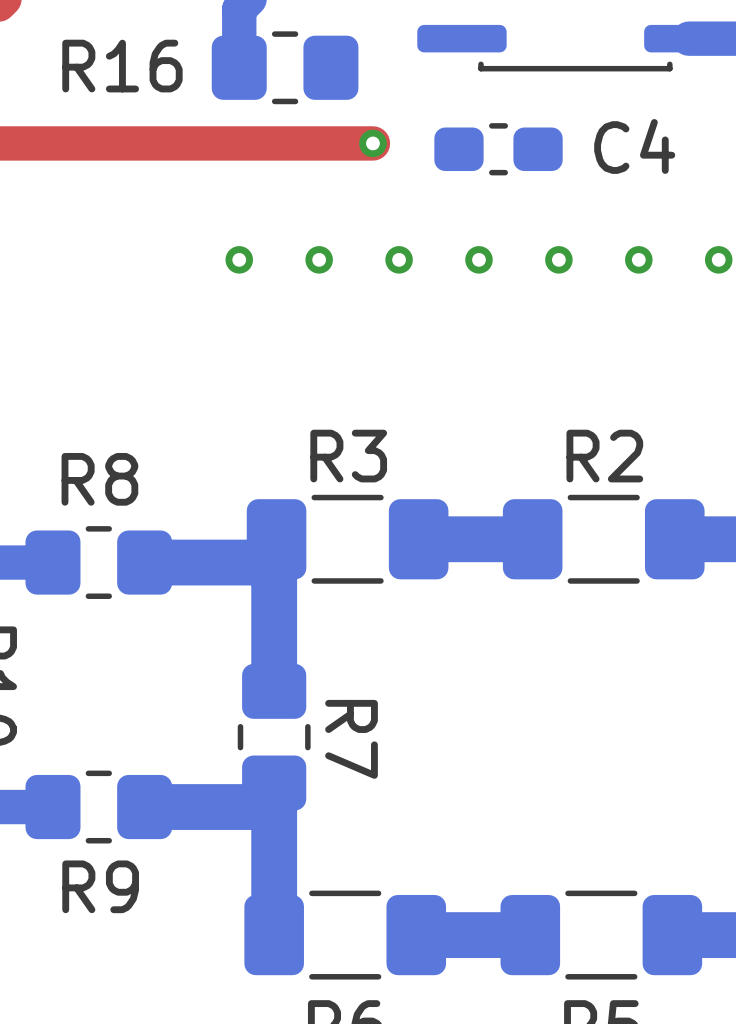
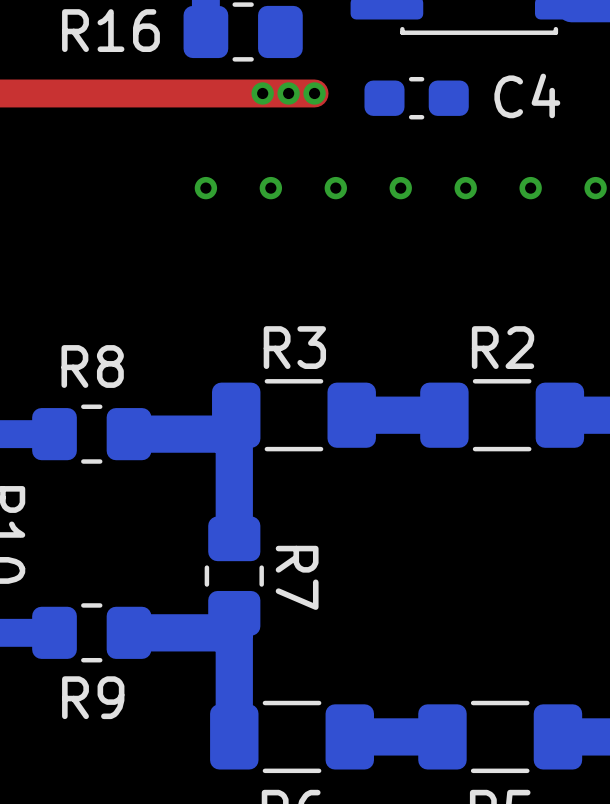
via: none -> (262, 93)
via: none -> (288, 93)

